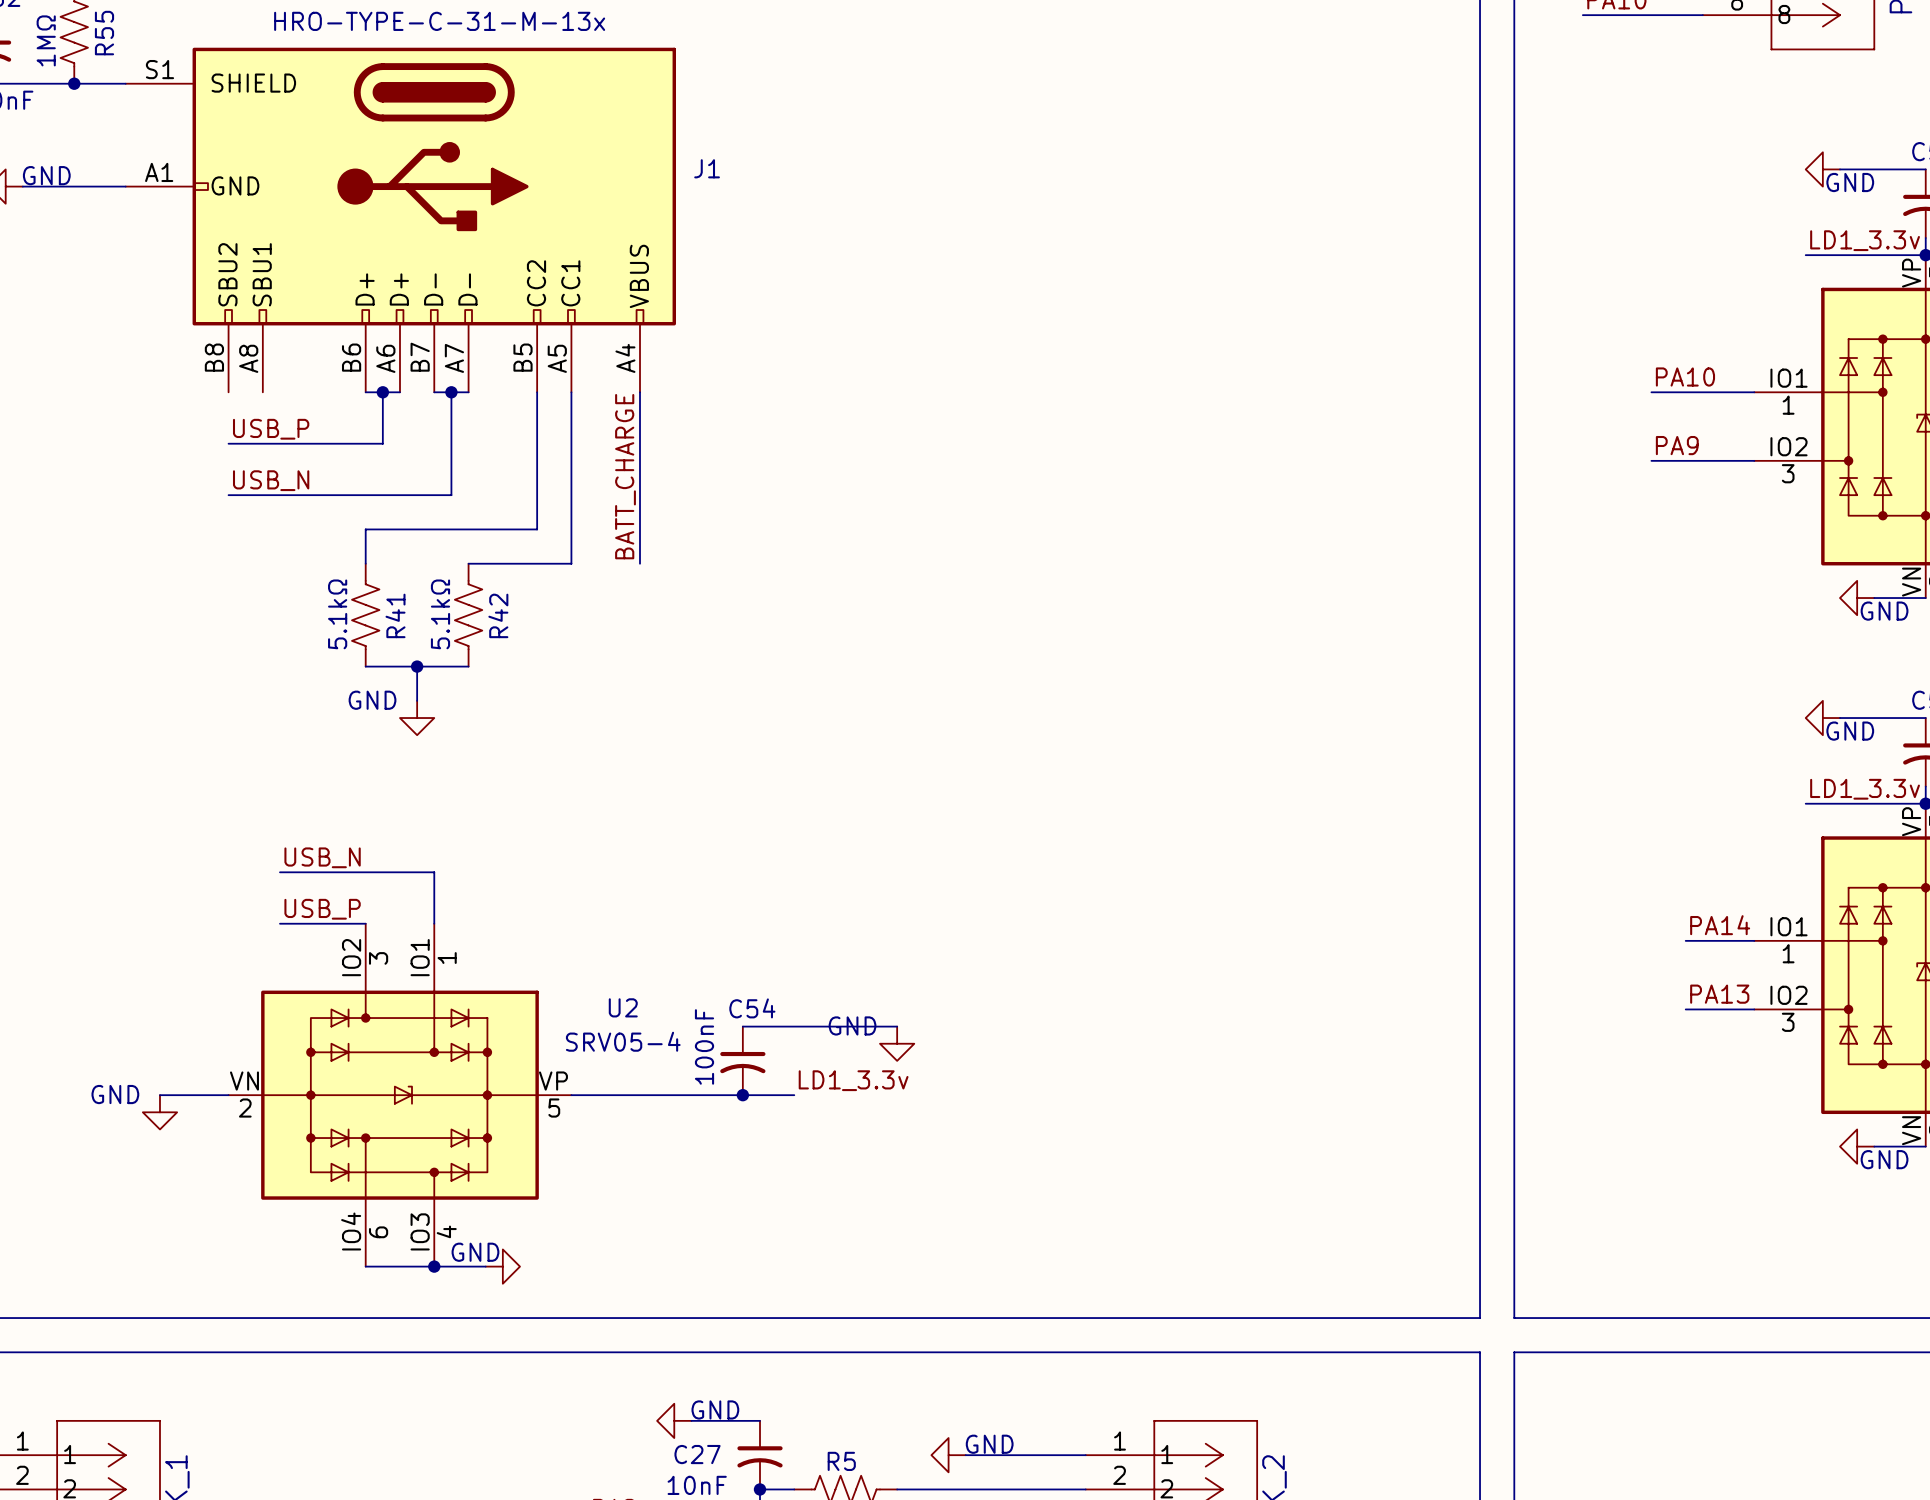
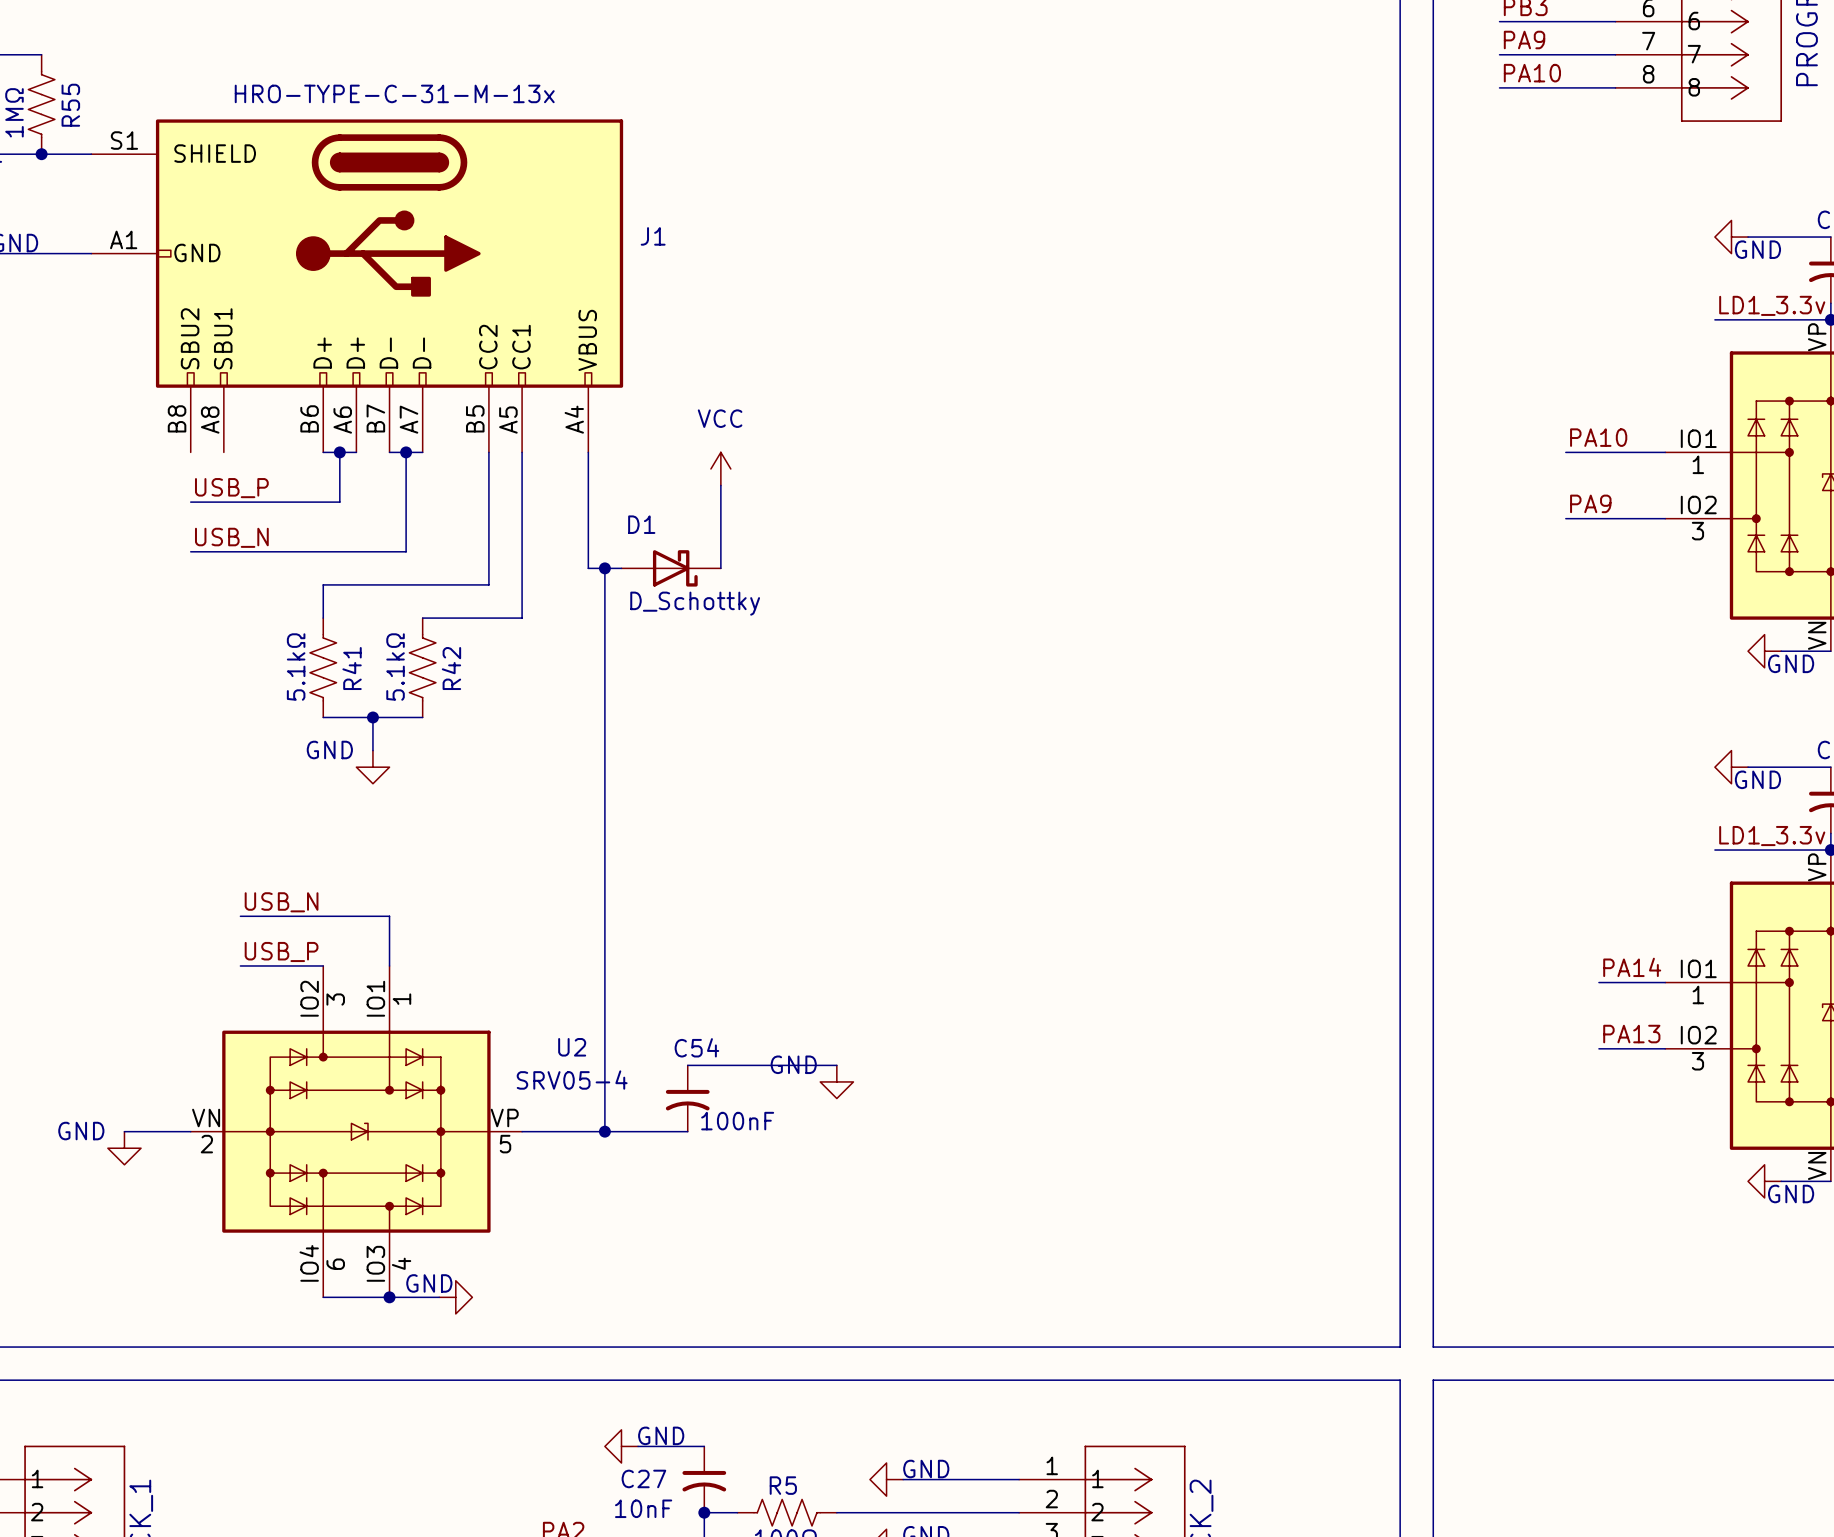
power symbol: none -> VCC (720, 468)
wire: none -> (720, 485) (720, 568)
label: BATT_CHARGE (625, 476) -> none
wire: (639, 512) (639, 563) -> (588, 568) (621, 568)
wire: none -> (604, 568) (604, 1131)
junction: none -> (604, 568)
D1: none -> D_Schottky (671, 568)
C54 value rotation: 0° (704, 1046) -> 90° clockwise (737, 1121)
C54 value position: 100nF (704, 1046) -> 100nF (737, 1121)
label: LD1_3.3v (853, 1080) -> none
junction: none -> (604, 1131)
wire: (742, 1095) (794, 1095) -> none
junction: (742, 1095) -> none

